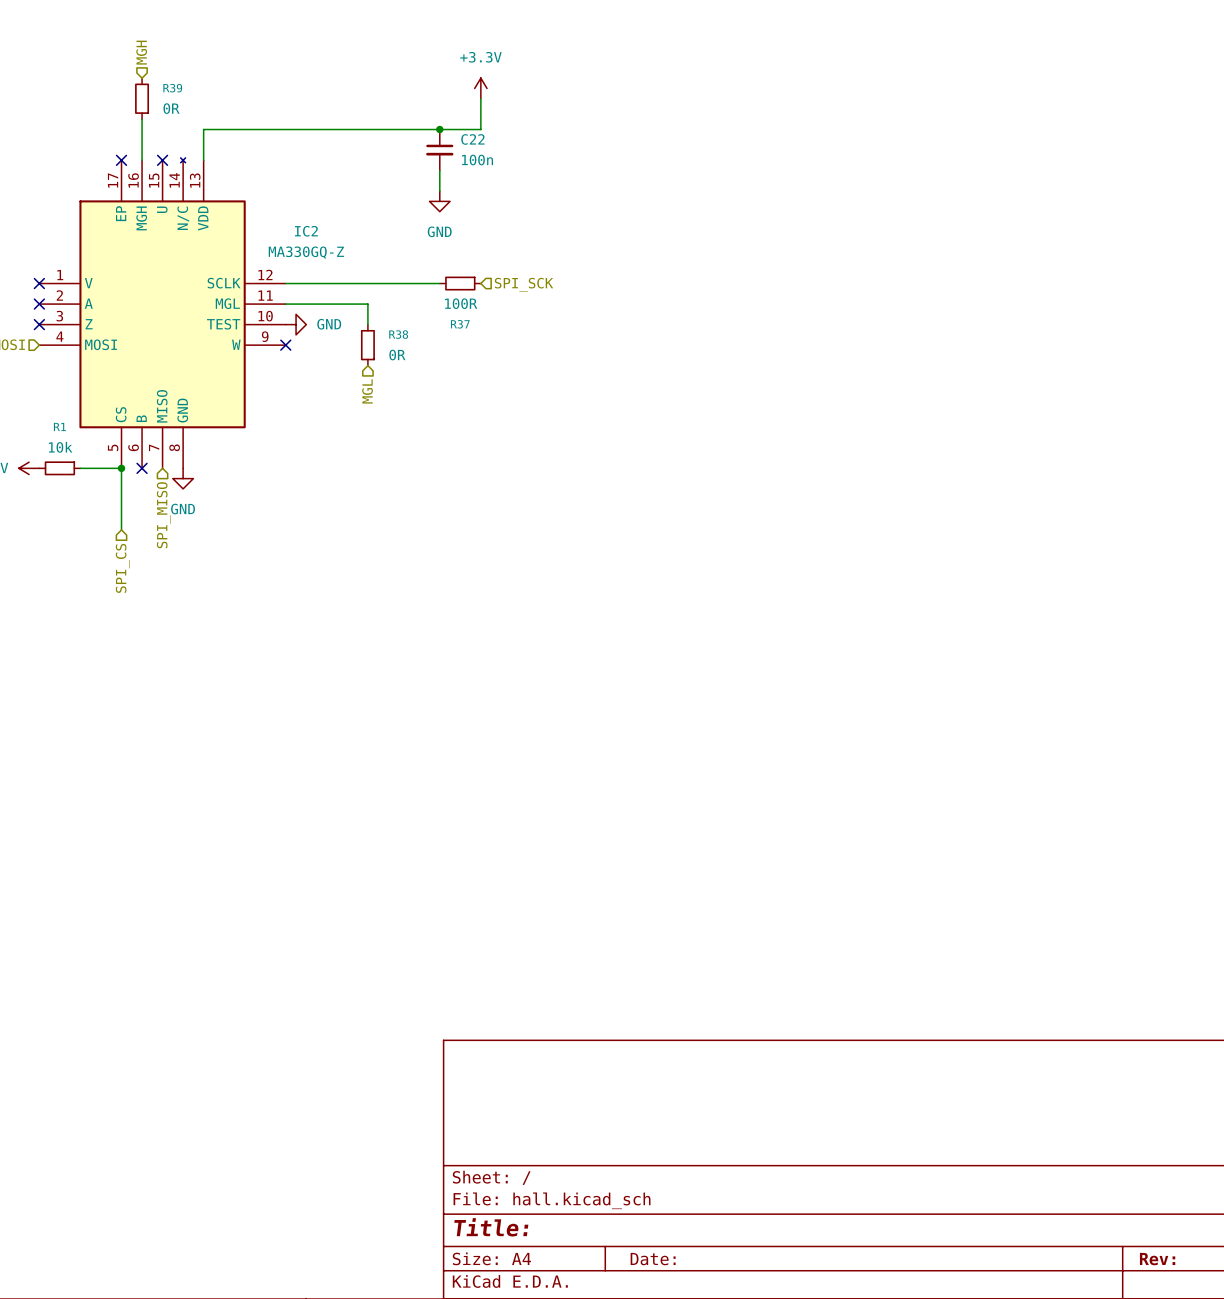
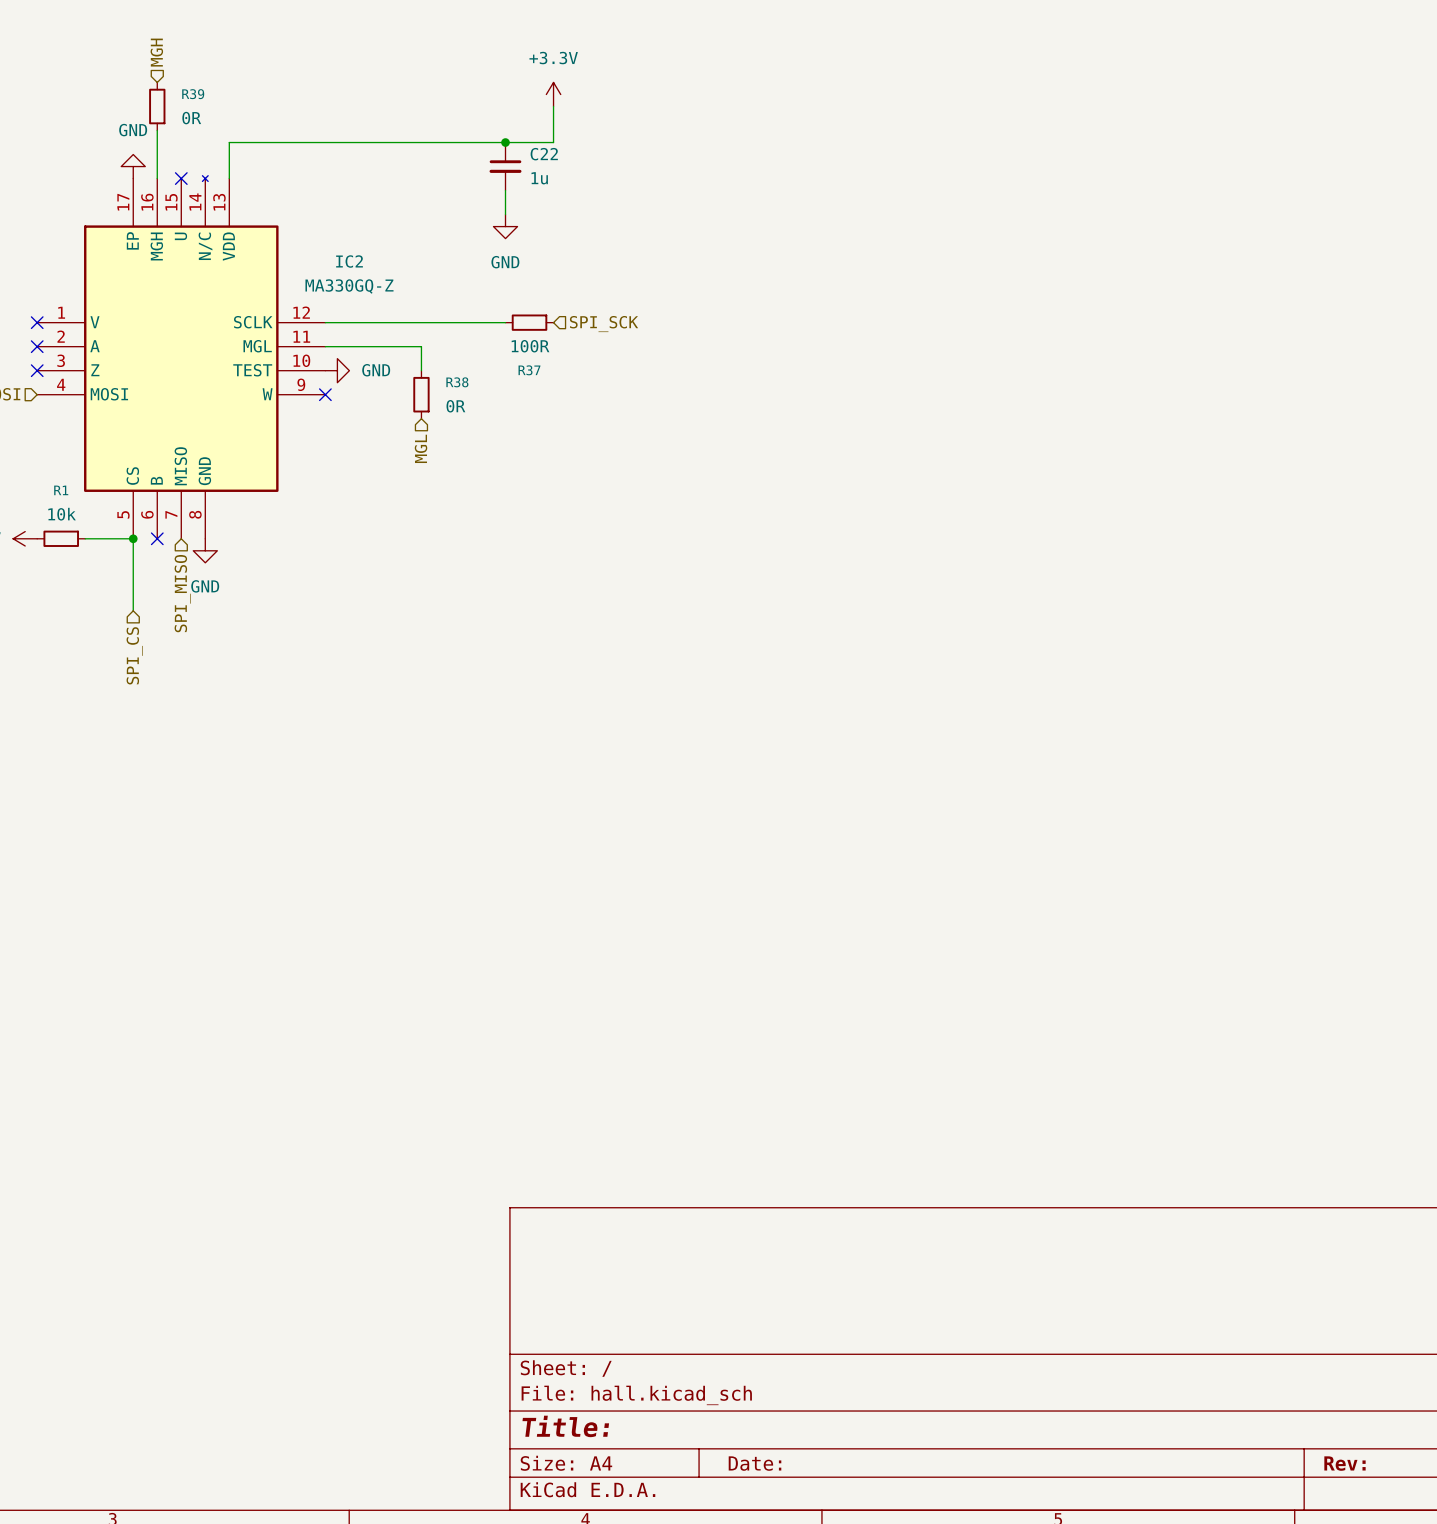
power symbol: none -> GND (133, 166)
no-connect mark: (121, 160) -> none
C22 value: 100n (477, 160) -> 1u (539, 178)

